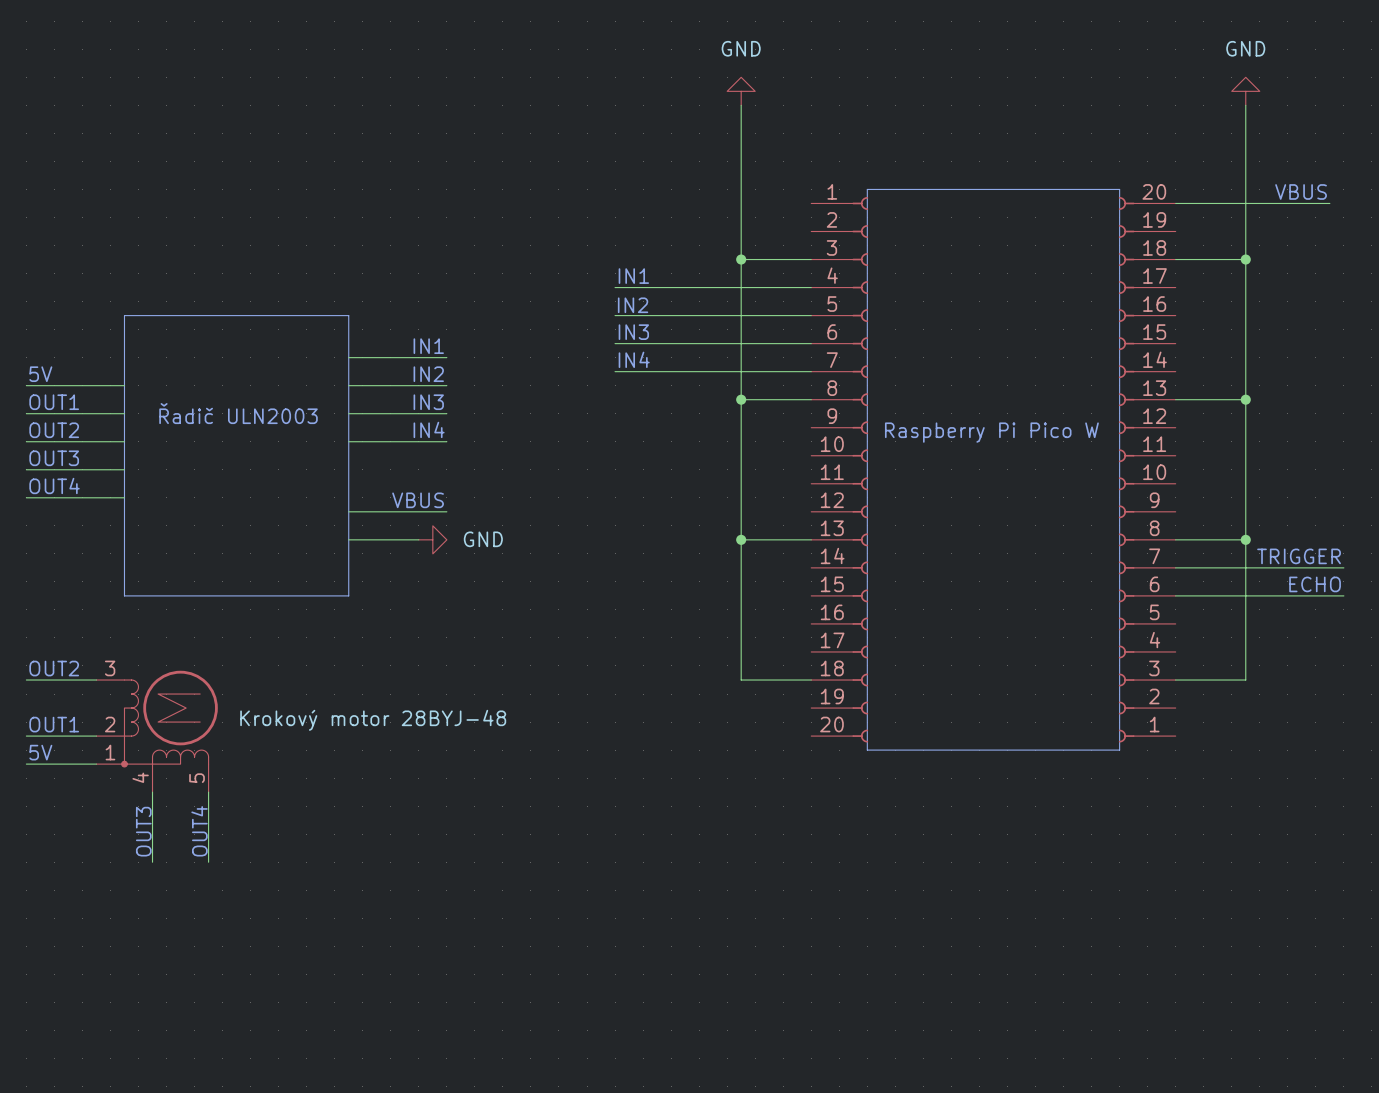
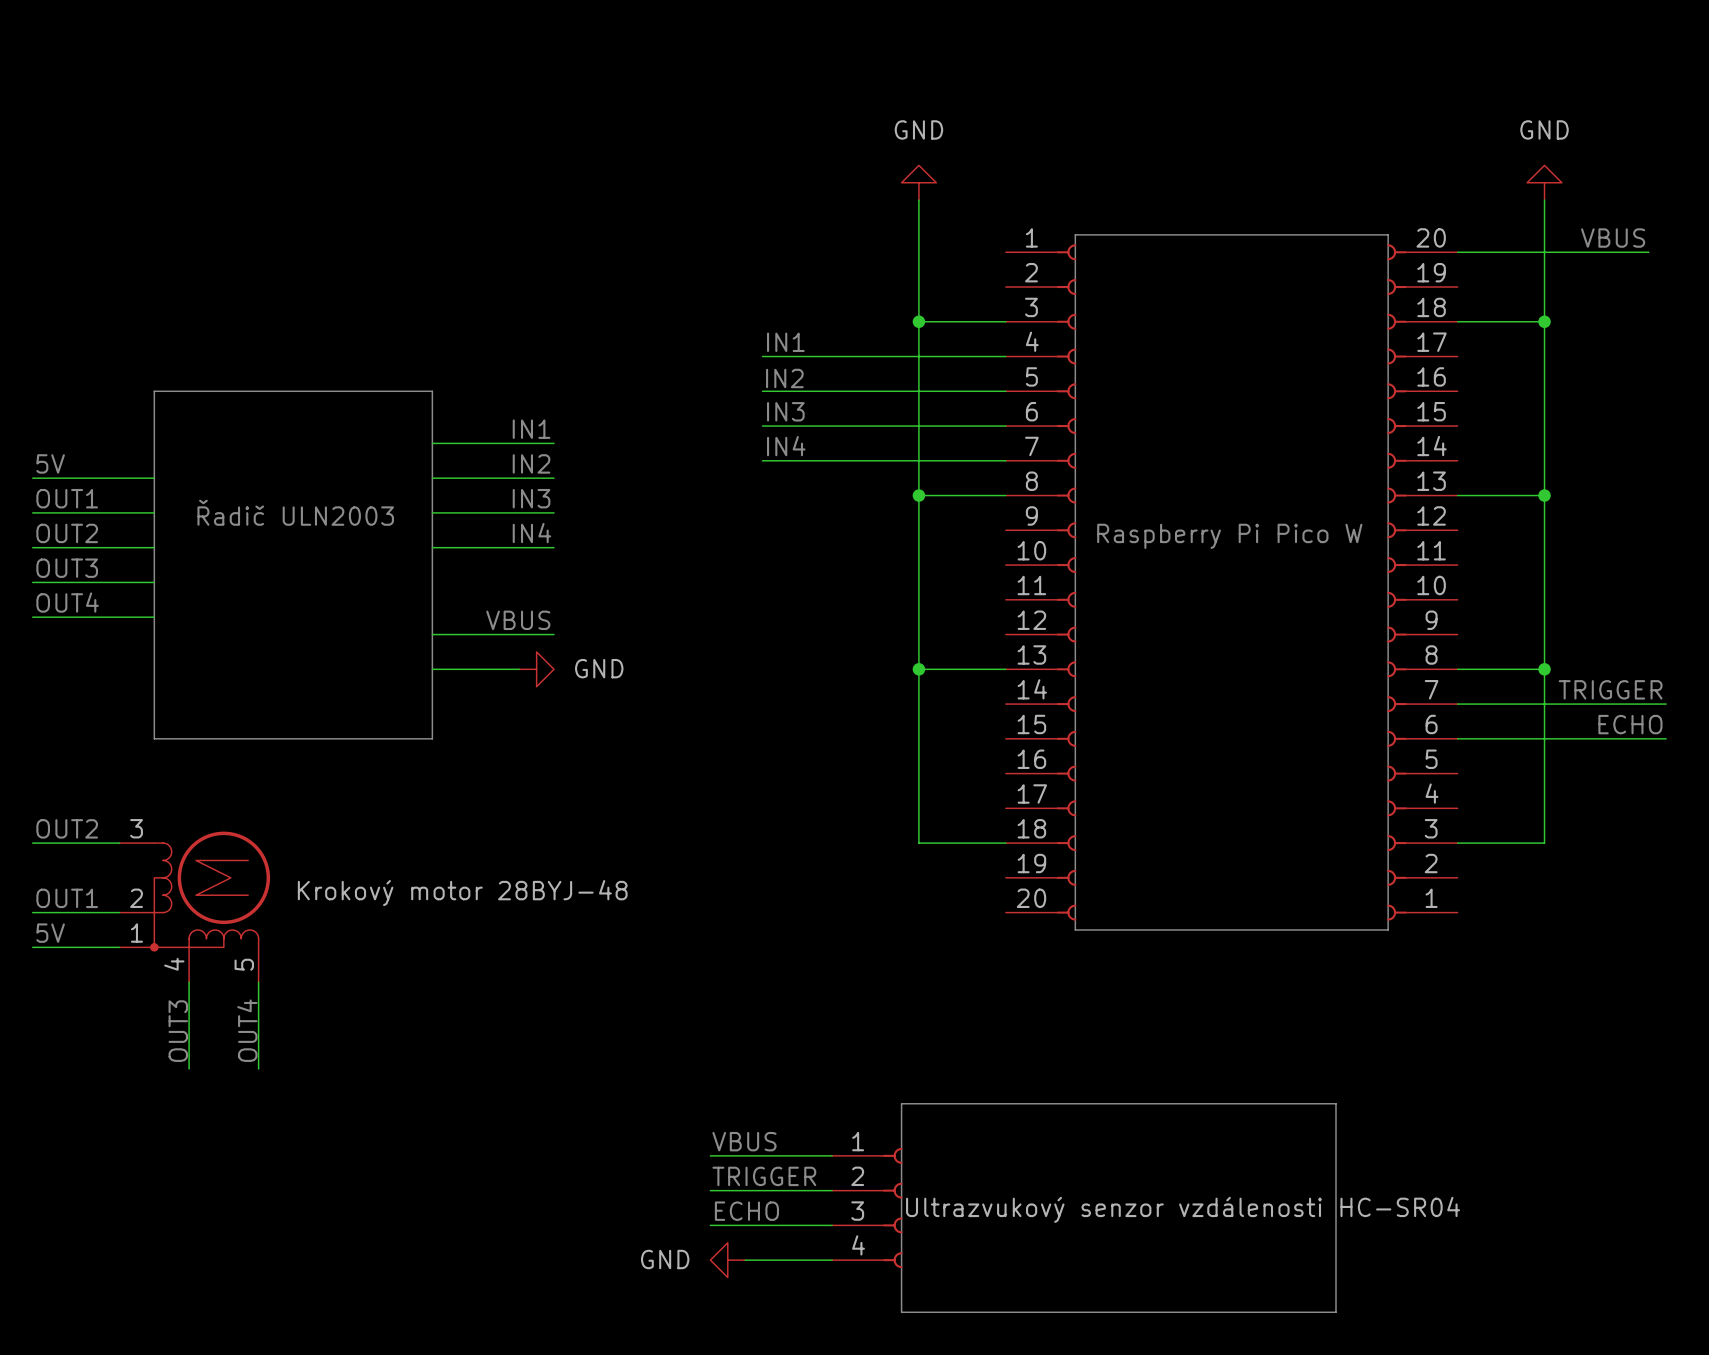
power symbol position: GND (741, 91) -> GND (918, 182)
power symbol position: GND (1245, 91) -> GND (1544, 182)
wire: (741, 105) (741, 161) -> none
wire: (1245, 105) (1245, 161) -> none
line: none -> (901, 1103) (1335, 1103) (1335, 1312) (901, 1312) (901, 1103)
text: none -> VBUS (744, 1141)
wire: none -> (710, 1155) (832, 1155)
text: none -> TRIGGER (764, 1176)
wire: none -> (710, 1190) (832, 1190)
part: none -> Ultrazvukový senzor vzdálenosti HC-SR04 (867, 1208)
text: none -> ECHO (746, 1211)
wire: none -> (710, 1225) (832, 1225)
power symbol: none -> GND (727, 1260)
wire: none -> (745, 1260) (832, 1260)

